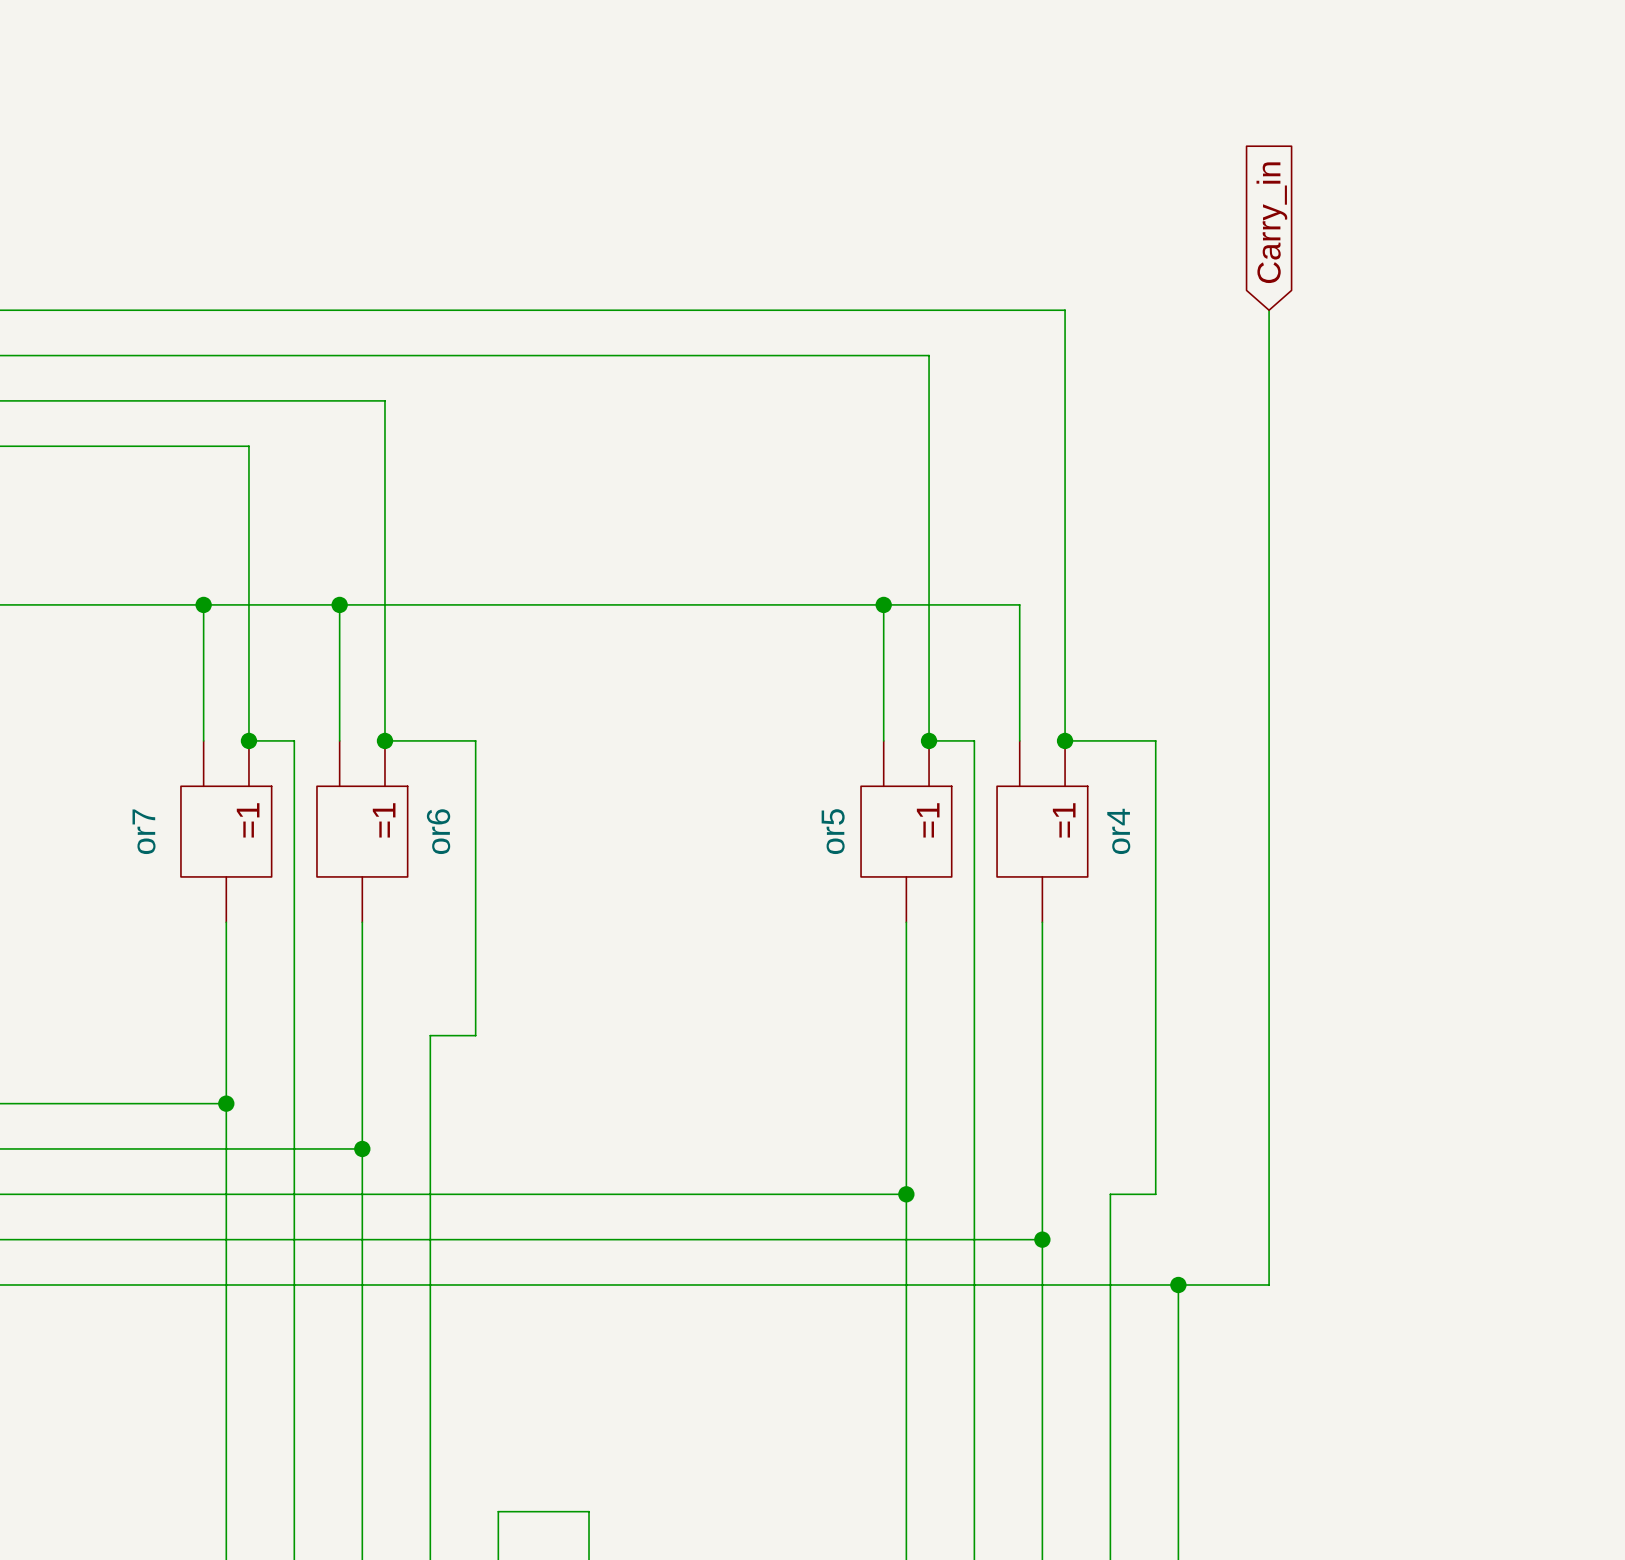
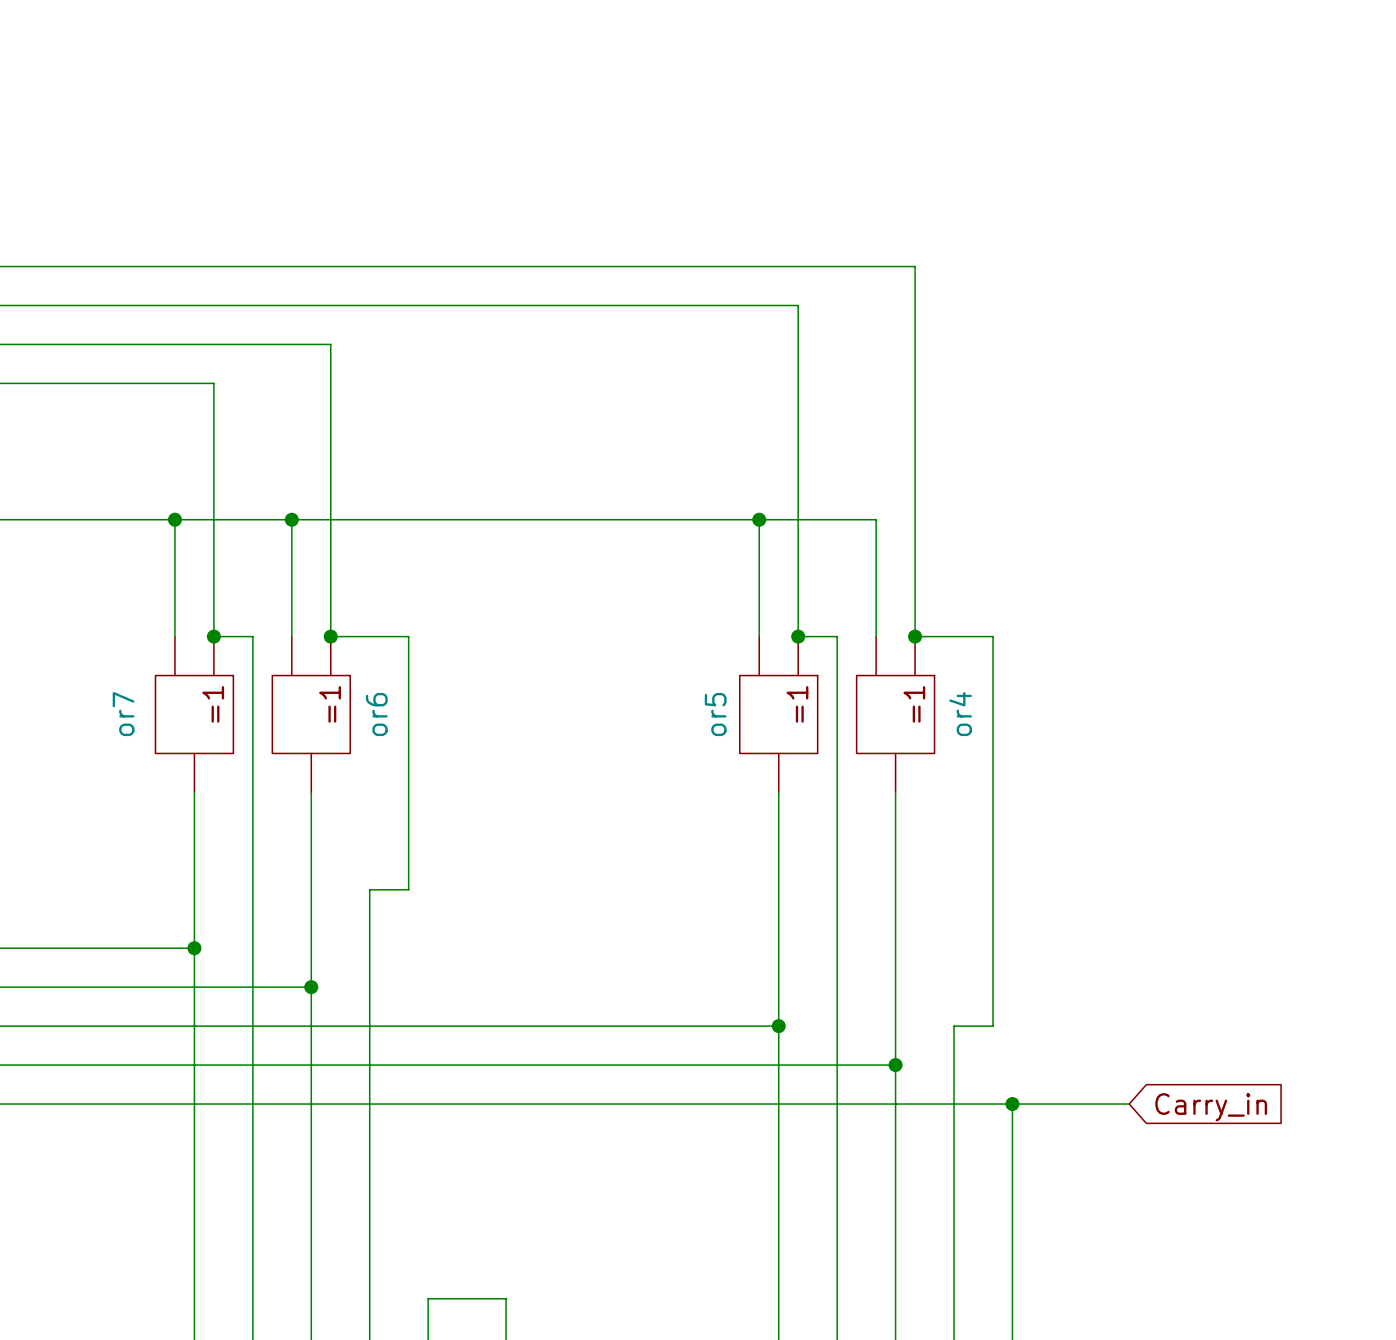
global label: Carry_in (1271, 222) -> none
wire: (1269, 310) (1269, 1284) -> (1129, 1104) (1090, 1104)
global label: none -> Carry_in (1211, 1107)

